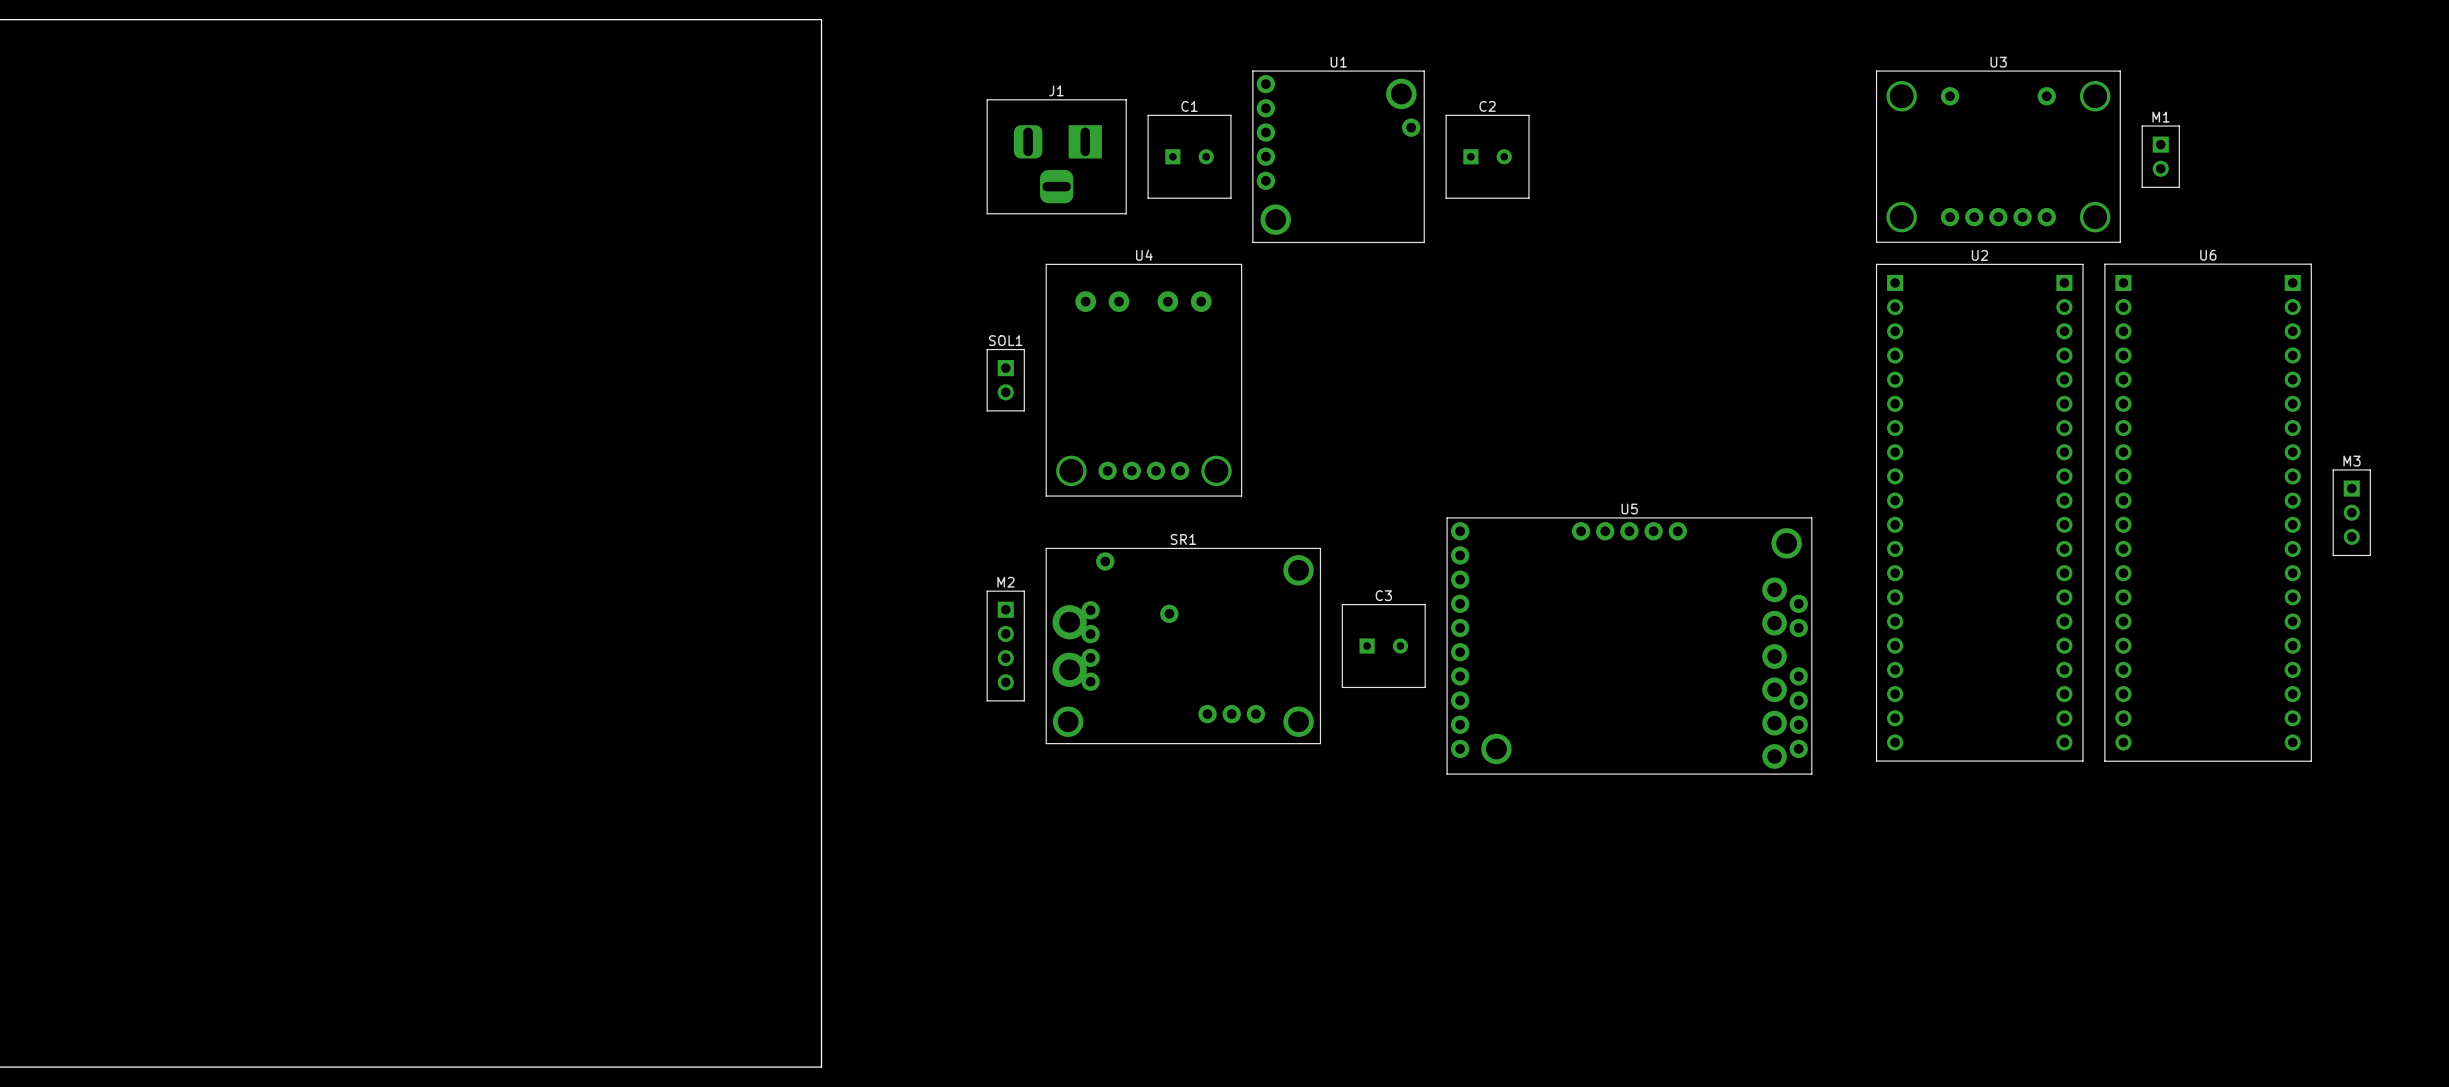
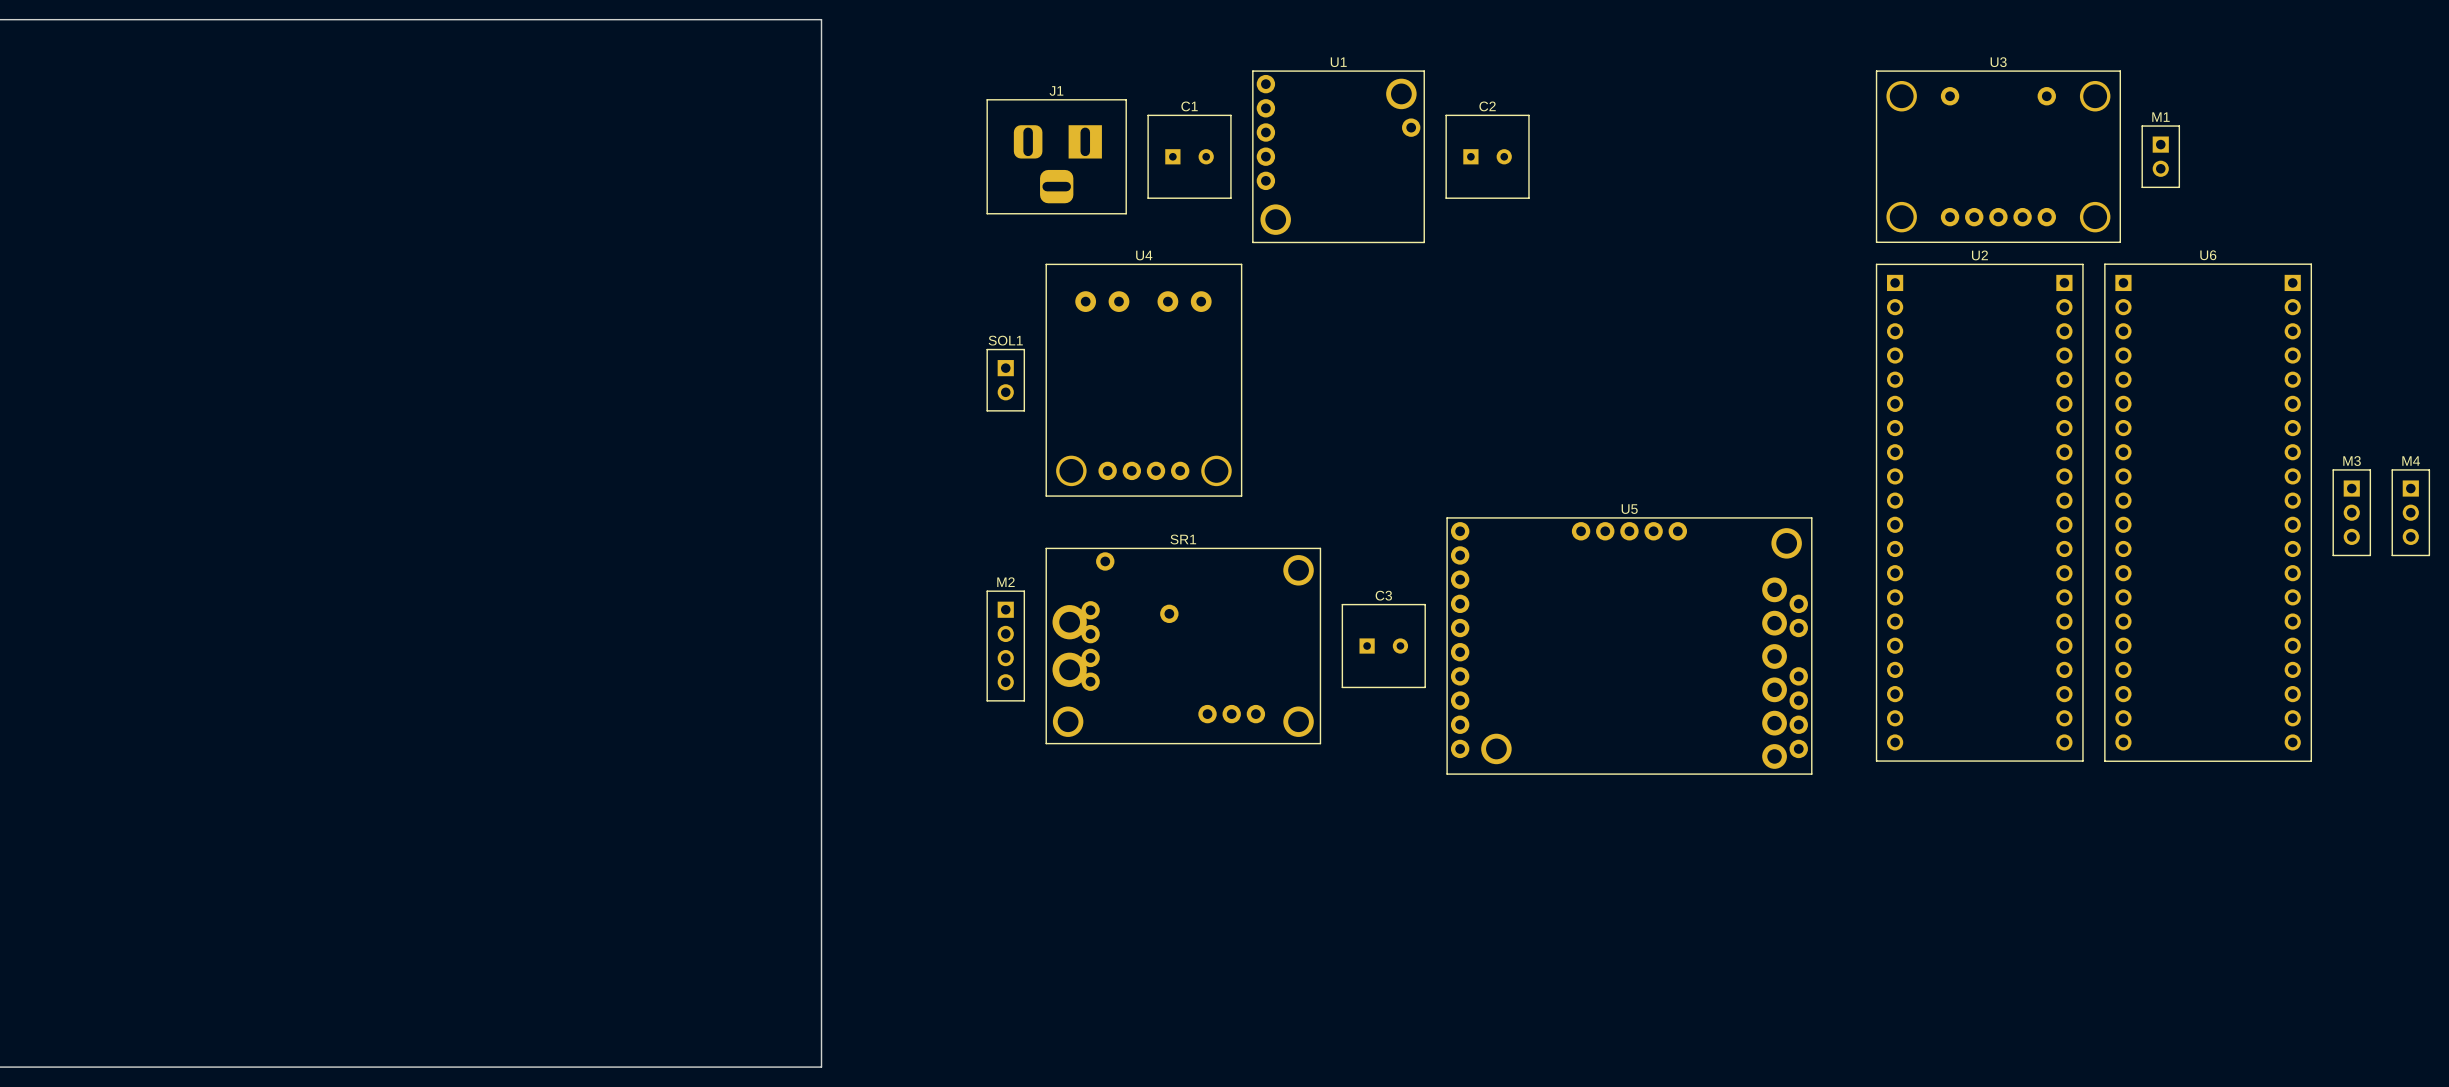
M4: none -> (2410, 512)

